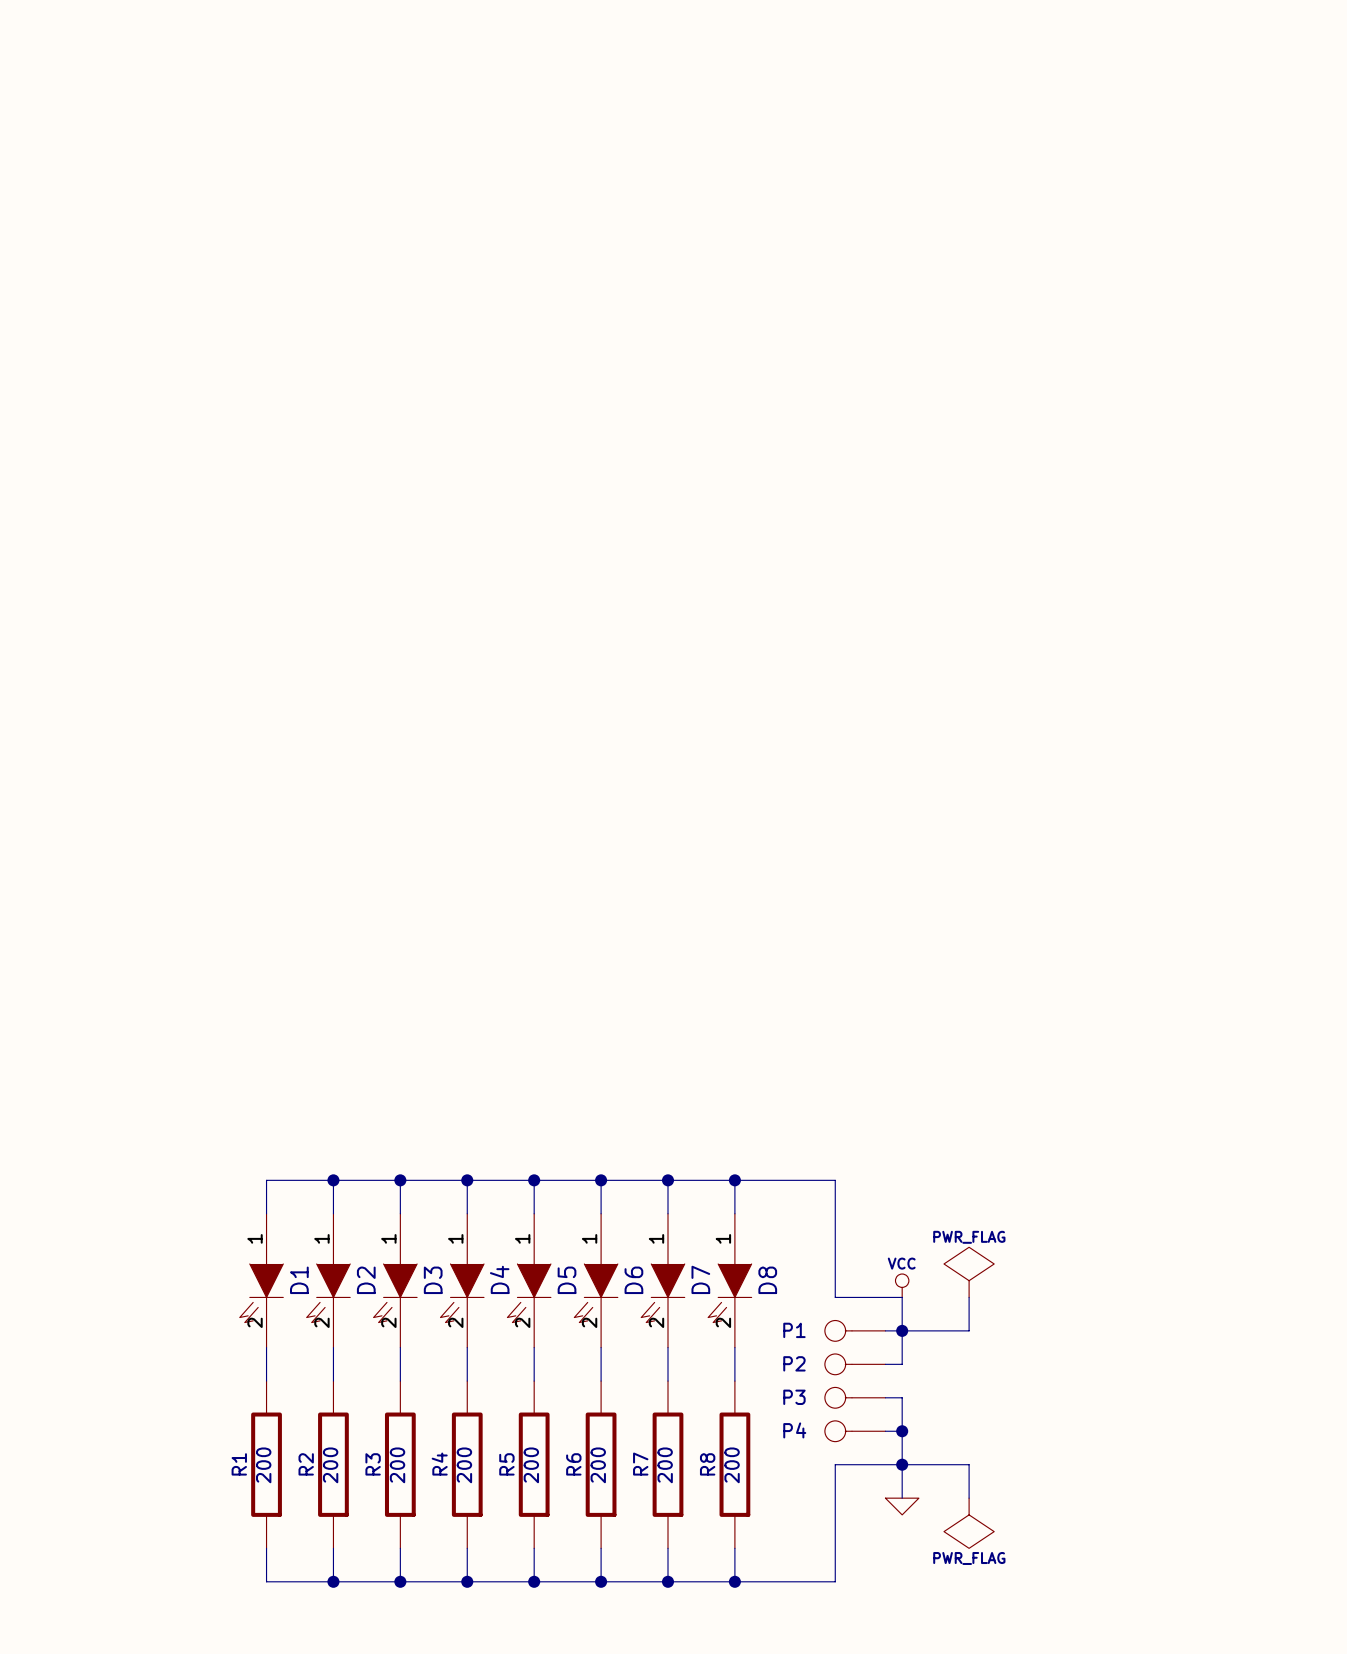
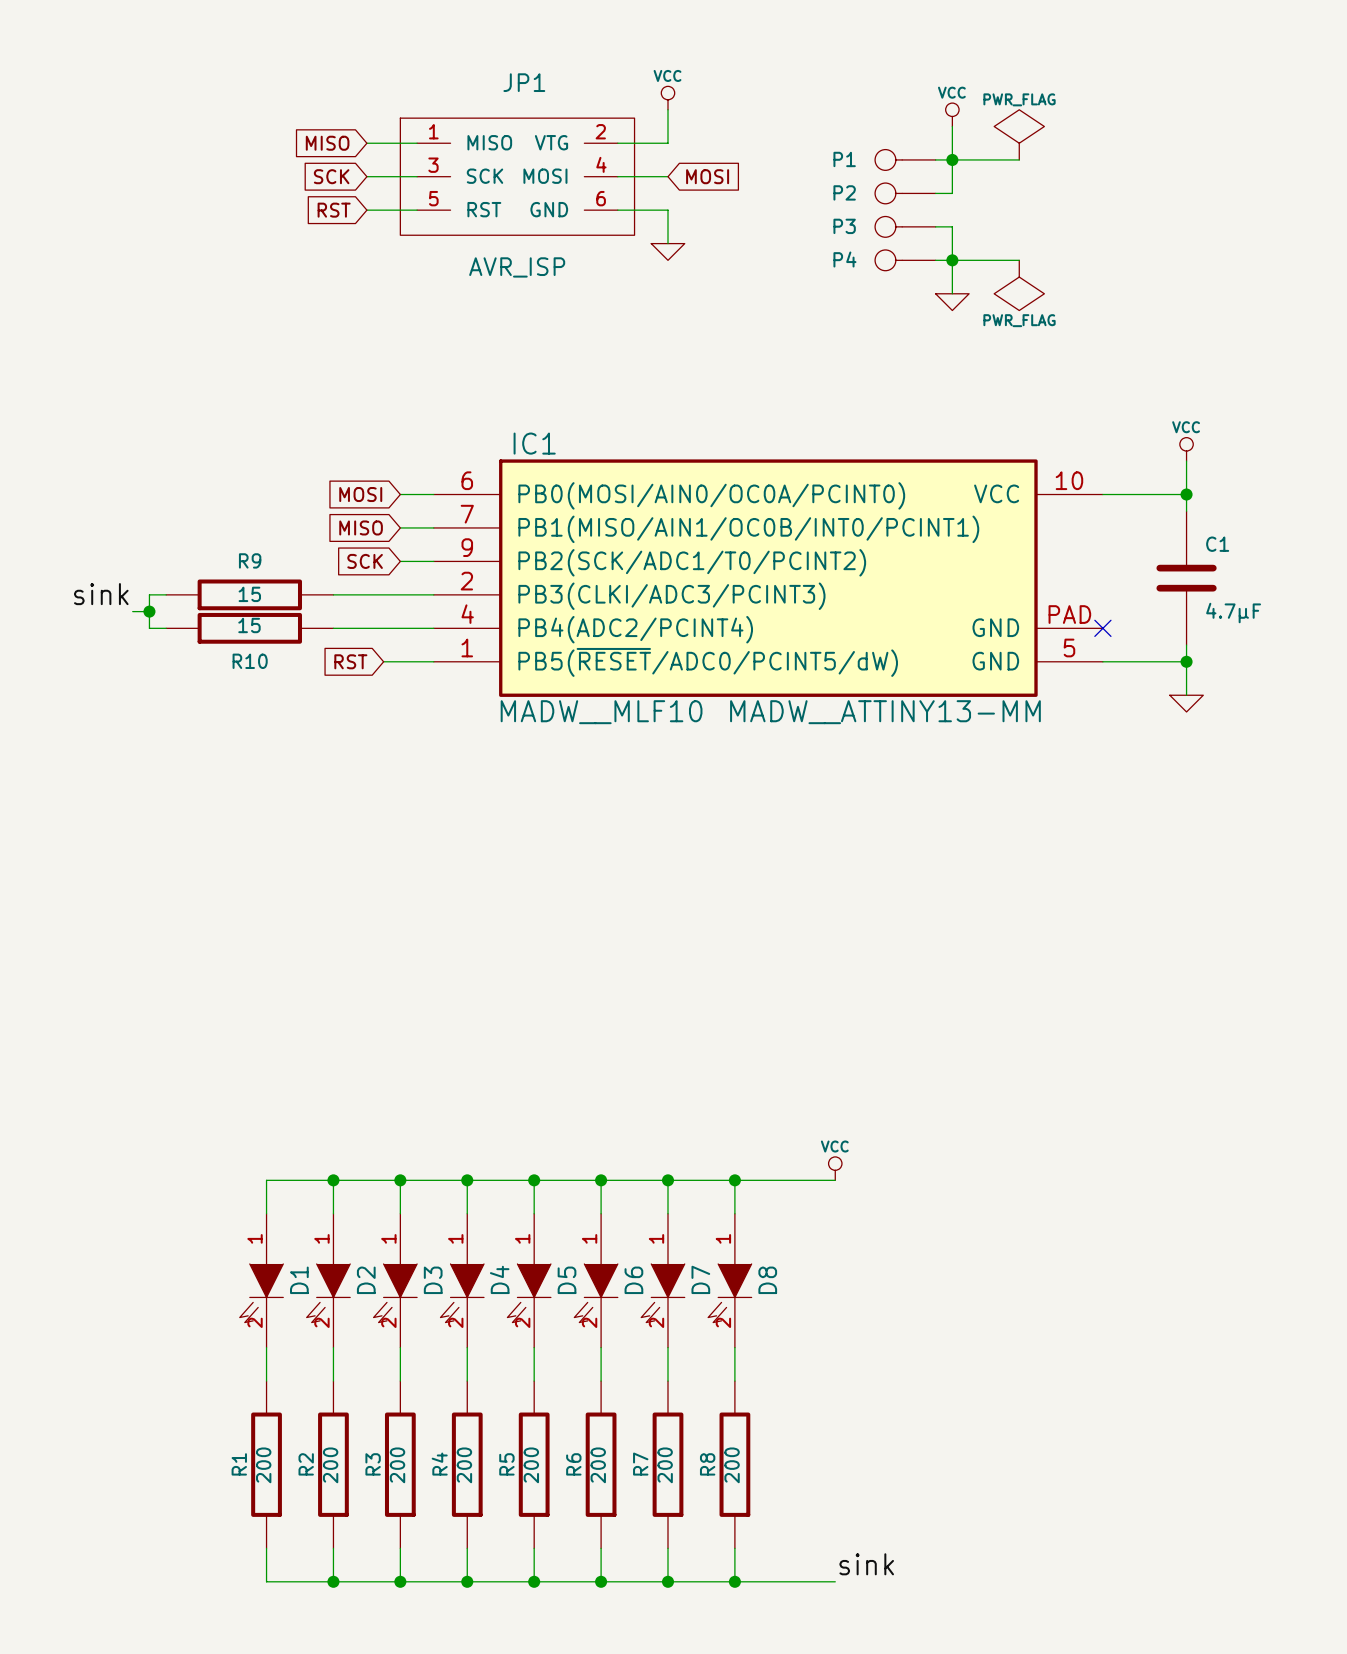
power symbol: none -> VCC (668, 98)
wire: none -> (668, 109) (668, 143) (617, 143)
power symbol: none -> VCC (952, 114)
wire: none -> (952, 126) (952, 193) (935, 193)
power symbol: none -> PWR_FLAG (1019, 134)
global label: none -> MISO (327, 143)
wire: none -> (366, 143) (417, 143)
wire: none -> (935, 159) (1019, 159)
junction: none -> (952, 159)
global label: none -> SCK (331, 176)
wire: none -> (366, 176) (417, 176)
JP1: none -> AVR_ISP (517, 176)
wire: none -> (617, 176) (668, 176)
global label: none -> MOSI (707, 176)
global label: none -> RST (334, 210)
wire: none -> (366, 210) (417, 210)
wire: none -> (617, 210) (668, 210) (668, 243)
wire: none -> (935, 226) (952, 226) (952, 293)
power symbol: none -> (668, 251)
wire: none -> (935, 260) (1019, 260)
junction: none -> (952, 260)
power symbol: none -> PWR_FLAG (1019, 285)
power symbol: none -> (952, 302)
power symbol: none -> VCC (1186, 449)
wire: none -> (1186, 461) (1186, 511)
global label: none -> MOSI (360, 494)
wire: none -> (400, 494) (433, 494)
wire: none -> (1102, 494) (1186, 494)
junction: none -> (1186, 494)
global label: none -> MISO (361, 527)
wire: none -> (400, 527) (433, 527)
global label: none -> SCK (365, 561)
wire: none -> (400, 561) (433, 561)
IC1: none -> MADW__ATTINY13-MM (768, 578)
C1: none -> 4.7µF (1186, 578)
label: none -> sink (101, 594)
wire: none -> (166, 594) (149, 594) (149, 628) (166, 628)
R9: none -> 15 (249, 594)
wire: none -> (333, 594) (433, 594)
wire: none -> (132, 611) (149, 611)
junction: none -> (149, 611)
R10: none -> 15 (249, 628)
wire: none -> (333, 628) (433, 628)
no-connect mark: none -> (1102, 628)
wire: none -> (1186, 645) (1186, 695)
global label: none -> RST (350, 661)
wire: none -> (383, 661) (433, 661)
wire: none -> (1102, 661) (1186, 661)
junction: none -> (1186, 661)
power symbol: none -> (1186, 703)
wire: (835, 1180) (835, 1297) (902, 1297) (902, 1364) (885, 1364) -> none
power symbol: PWR_FLAG (969, 1272) -> none
power symbol position: VCC (902, 1285) -> VCC (835, 1168)
wire: (969, 1297) (969, 1330) (885, 1330) -> none
P1 position: (855, 1330) -> (905, 159)
junction: (902, 1330) -> none
P2 position: (855, 1364) -> (905, 193)
P3 position: (855, 1397) -> (905, 226)
wire: (885, 1397) (902, 1397) (902, 1498) -> none
P4 position: (855, 1431) -> (905, 260)
wire: (885, 1431) (902, 1431) -> none
junction: (902, 1431) -> none
junction: (902, 1464) -> none
wire: (969, 1498) (969, 1464) (835, 1464) (835, 1581) -> none
power symbol: (902, 1506) -> none
power symbol: PWR_FLAG (969, 1523) -> none
label: none -> sink (866, 1564)

